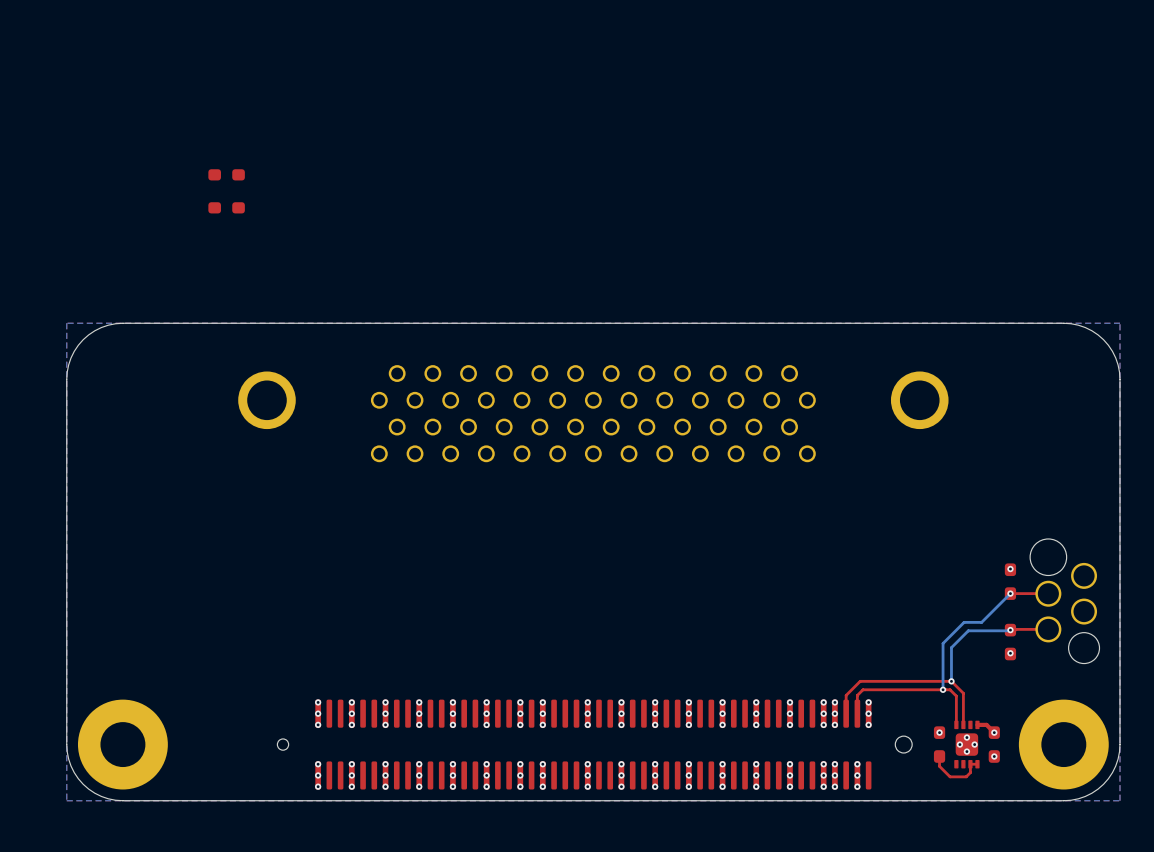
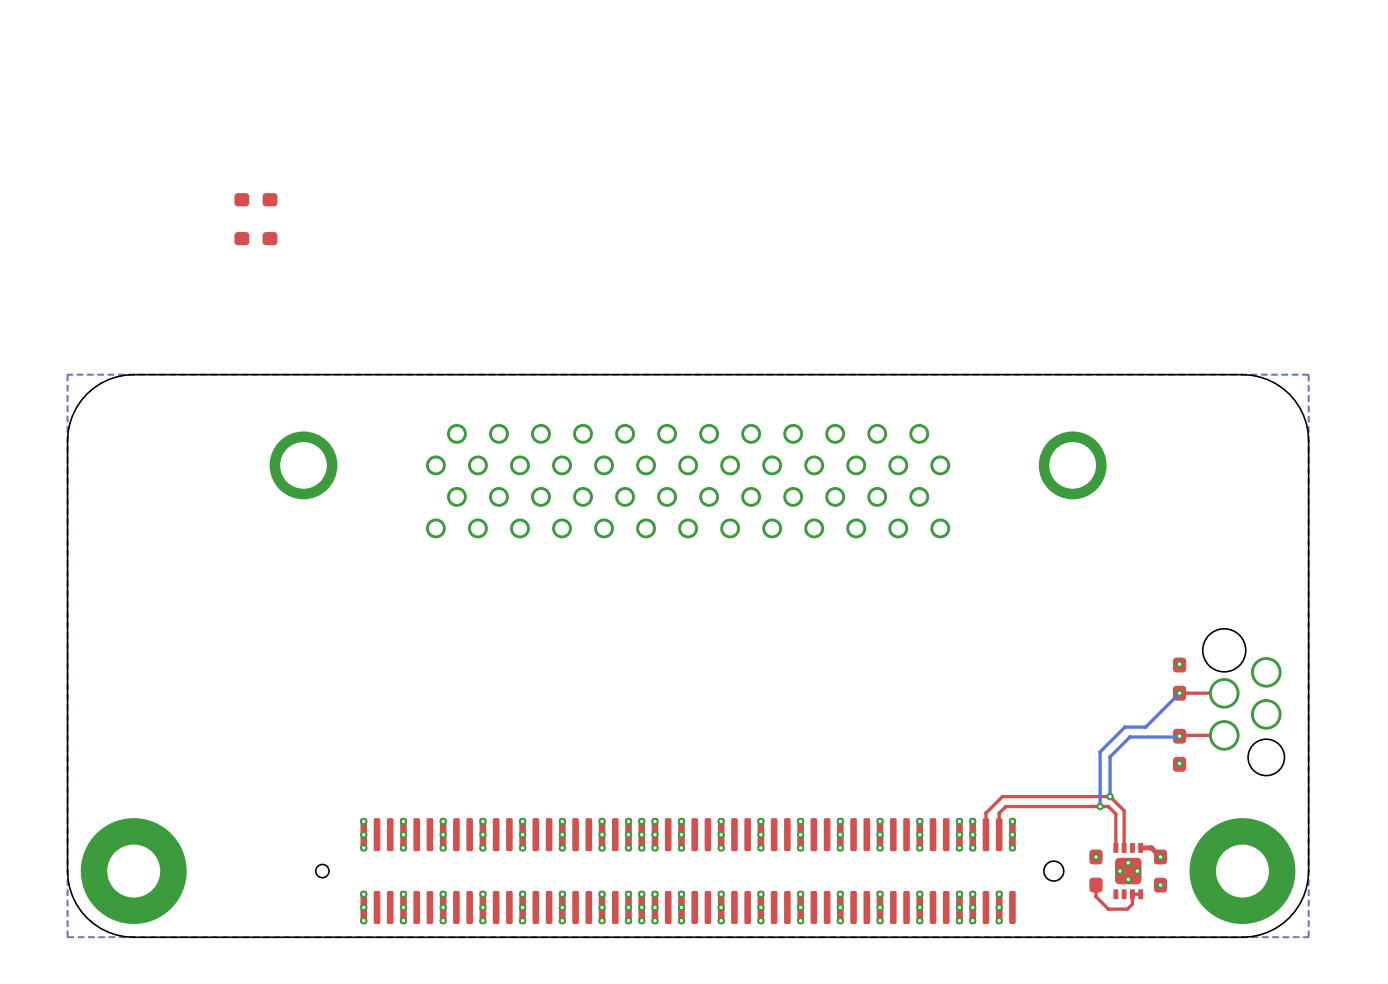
via: none -> (641, 821)
via: none -> (655, 821)
via: none -> (641, 834)
via: none -> (655, 834)
via: none -> (641, 847)
via: none -> (655, 847)
via: none -> (641, 894)
via: none -> (655, 894)
via: none -> (641, 907)
via: none -> (655, 907)
via: none -> (641, 920)
via: none -> (655, 920)

